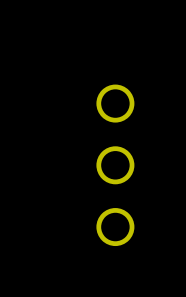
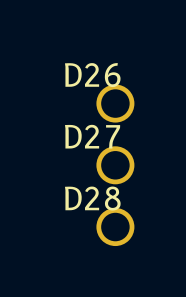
D26 name: none -> D26 (92, 75)
D27 name: none -> D27 (92, 136)
D28 name: none -> D28 (92, 198)

